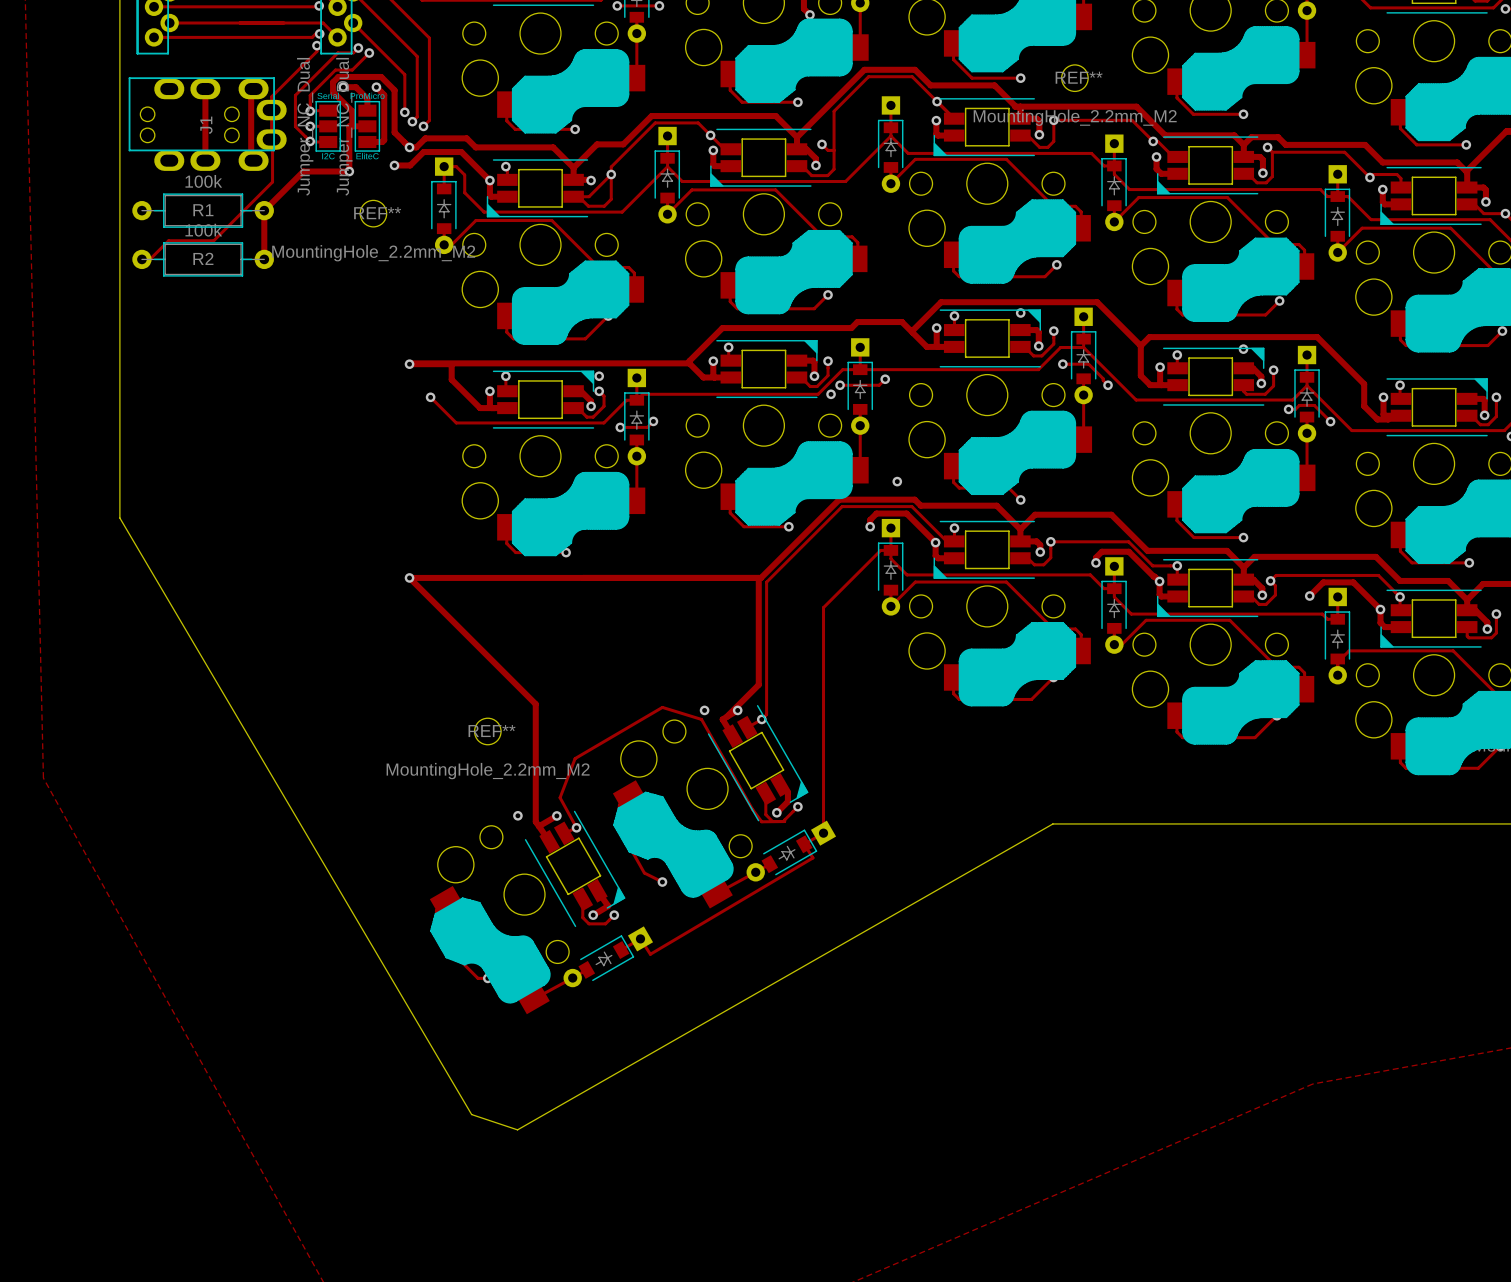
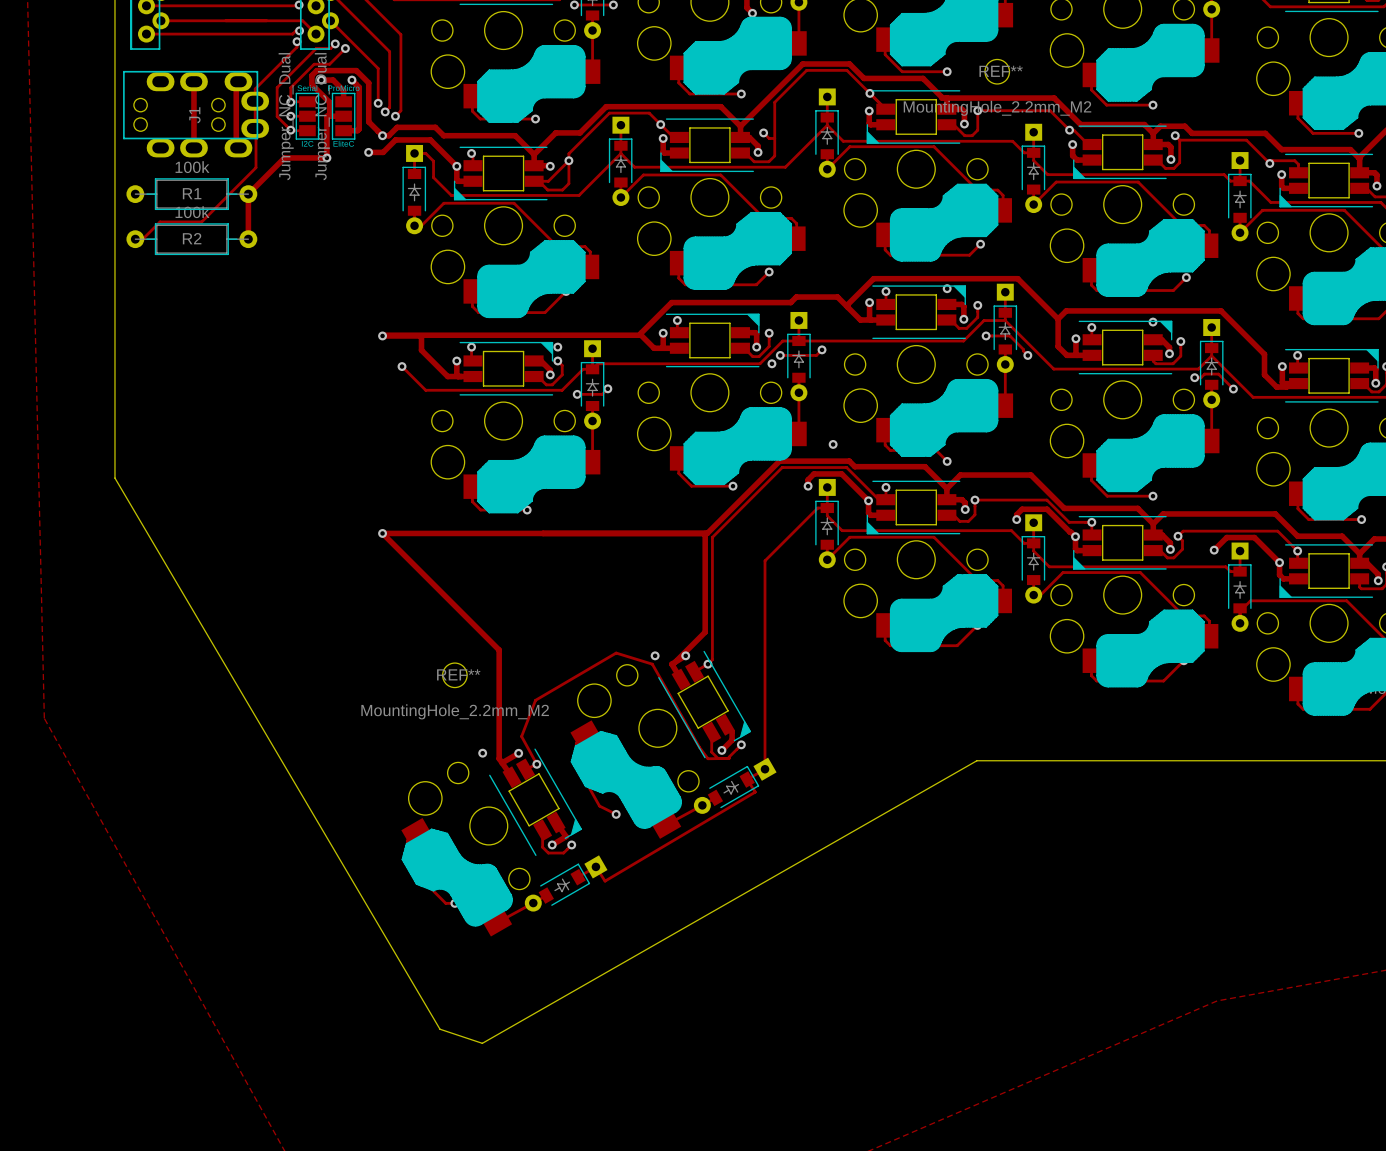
REF**: MountingHole_2.2mm_M2 (373, 213) -> none

